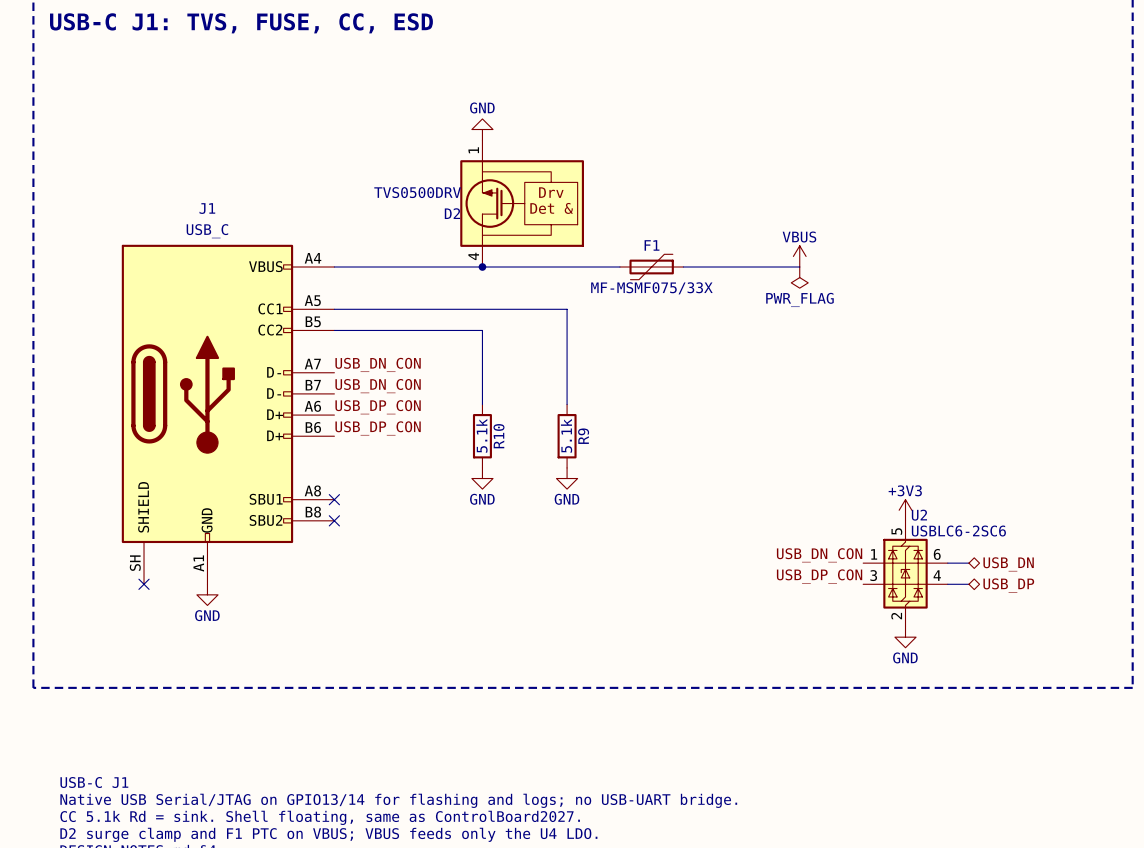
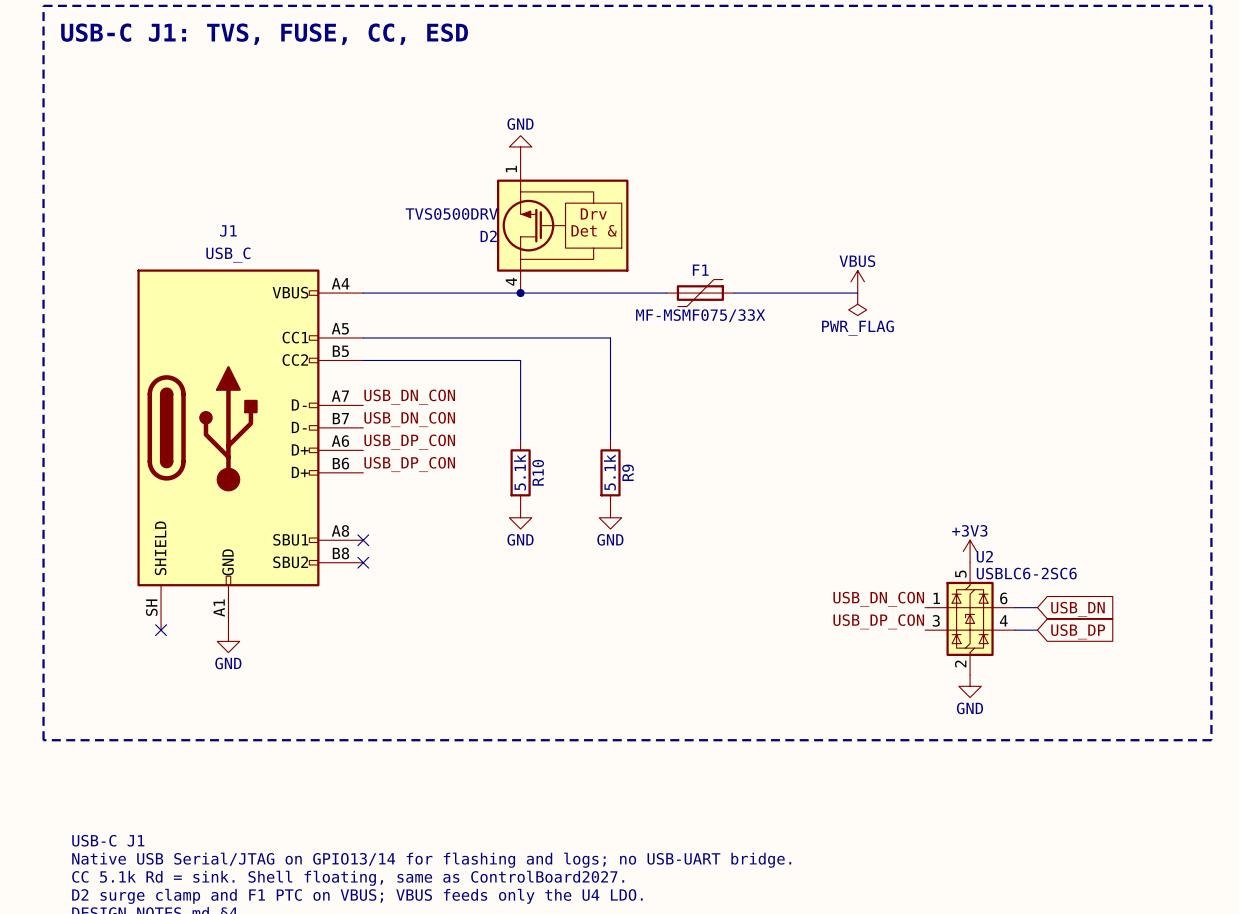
global label: none -> USB_DN (1077, 609)
hierarchical label: USB_DN (1008, 564) -> none
global label: none -> USB_DP (1078, 631)
hierarchical label: USB_DP (1008, 585) -> none

